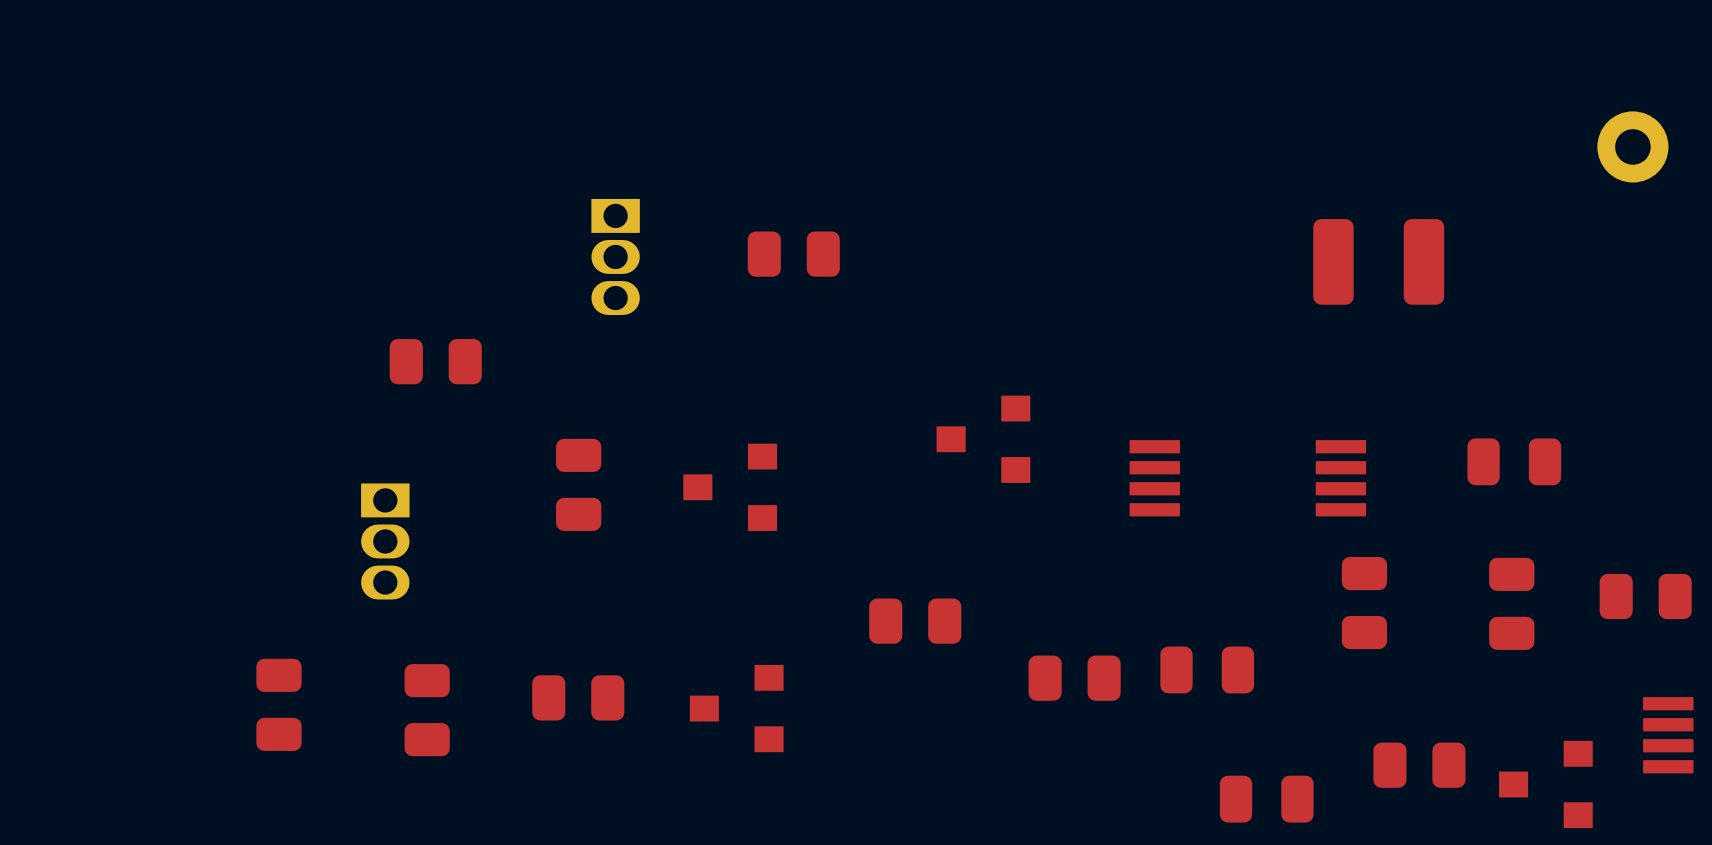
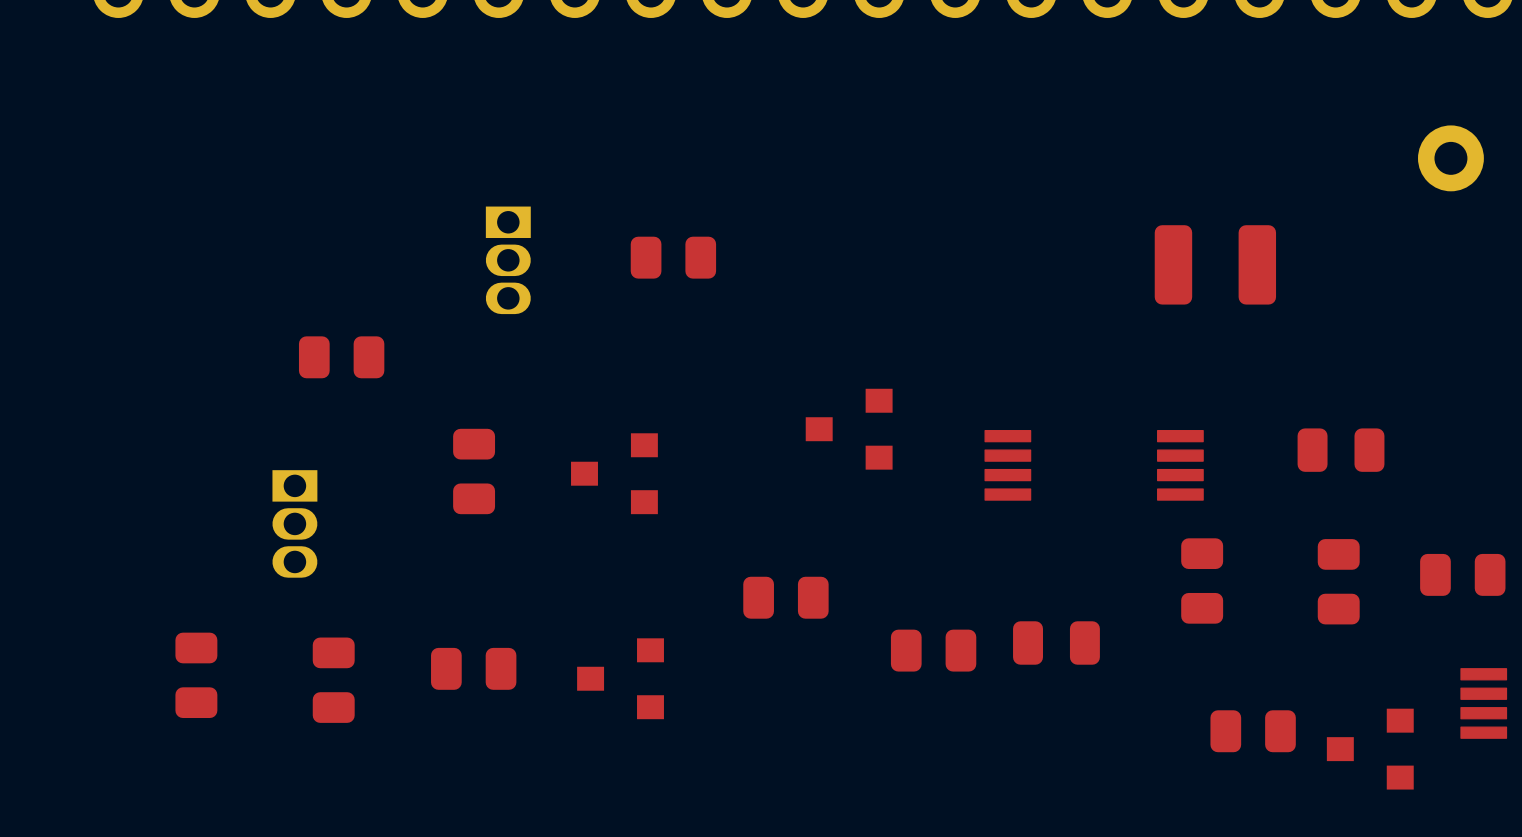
part: (1266, 799) -> none

